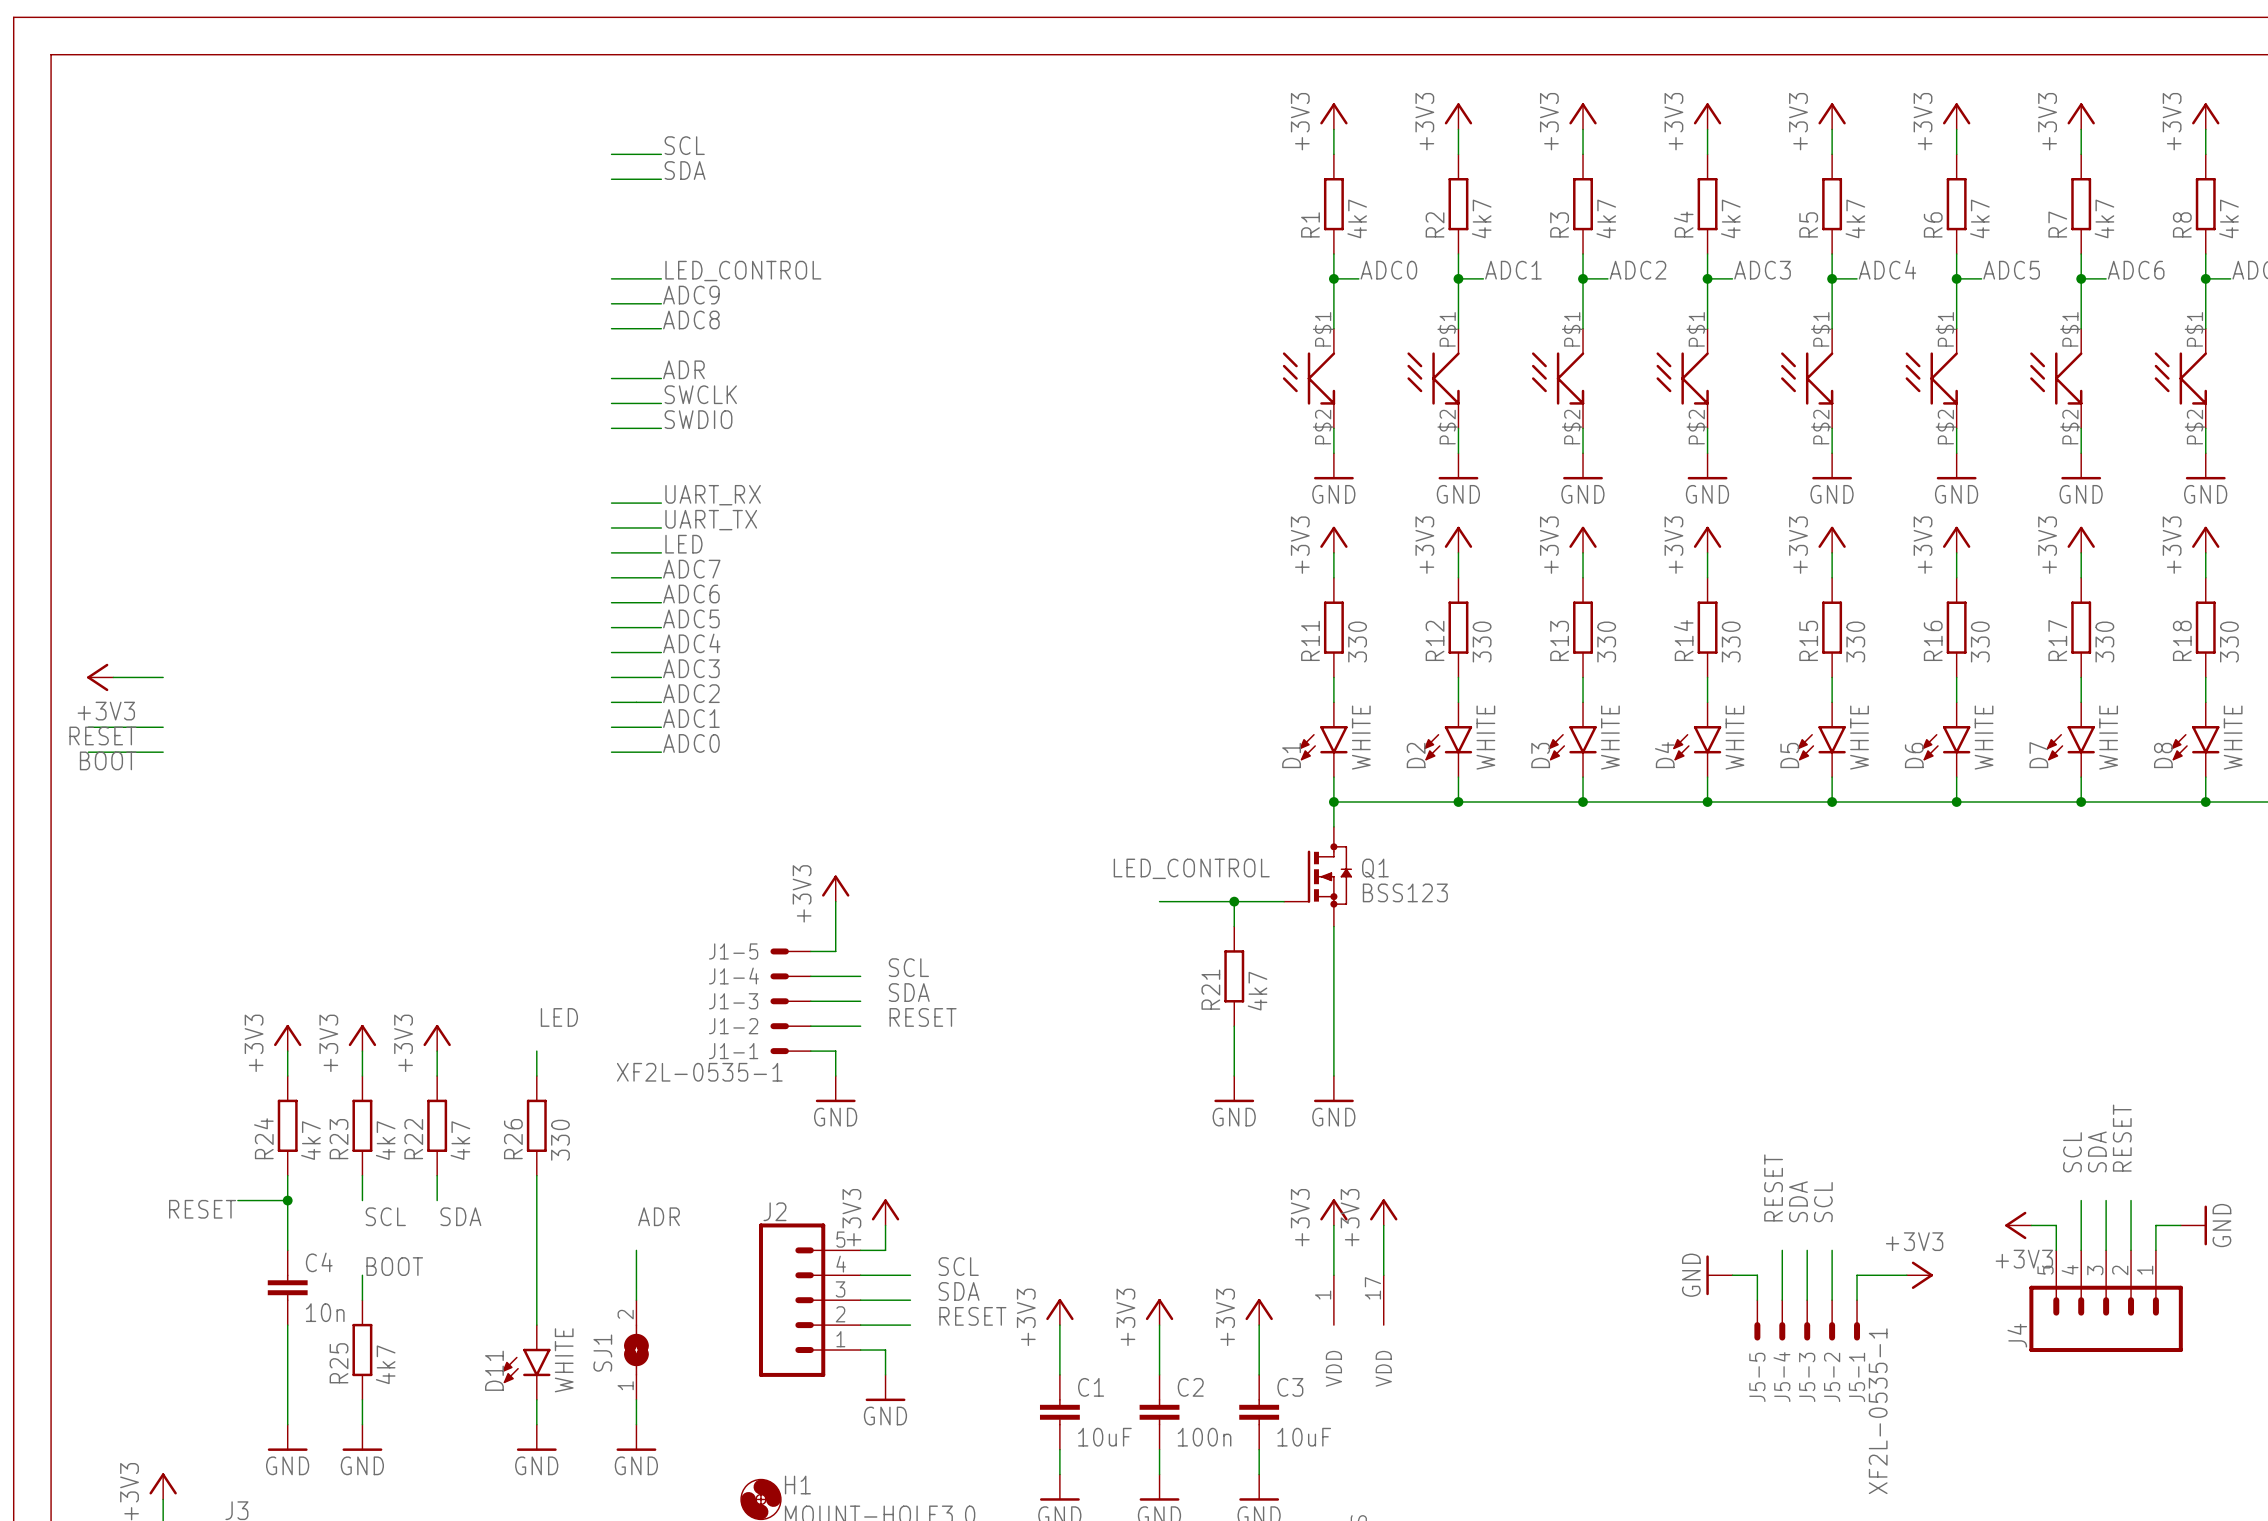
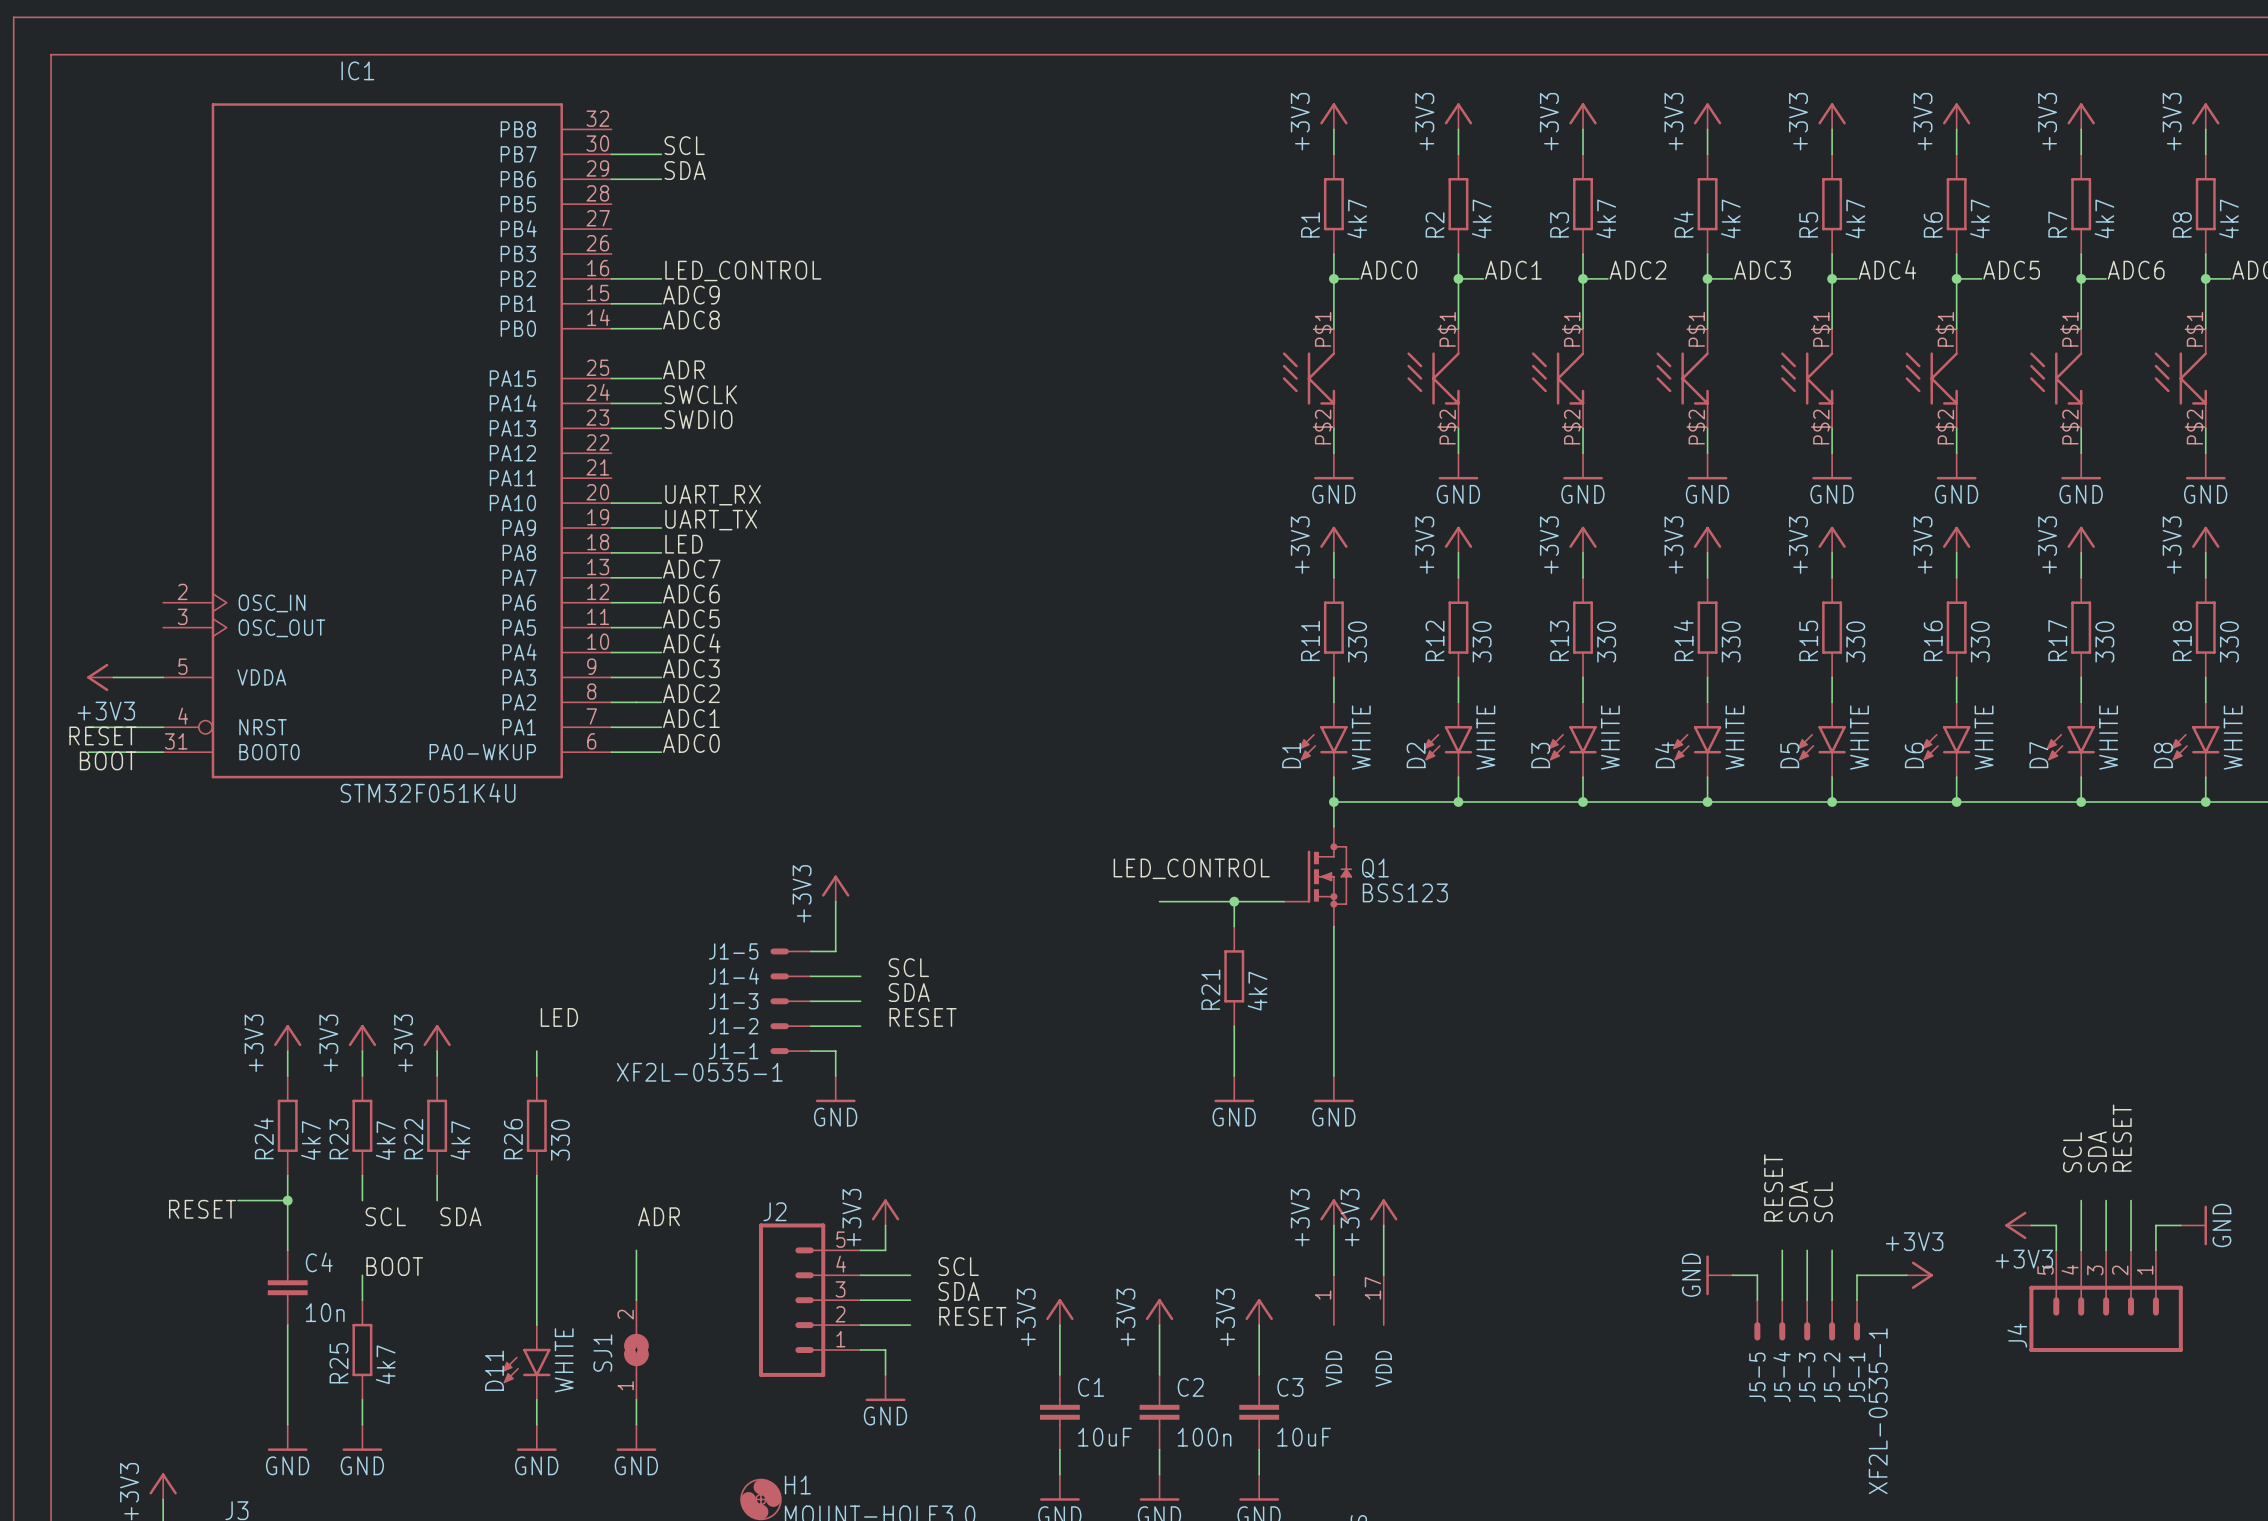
IC1: none -> STM32F051K4U (387, 440)

